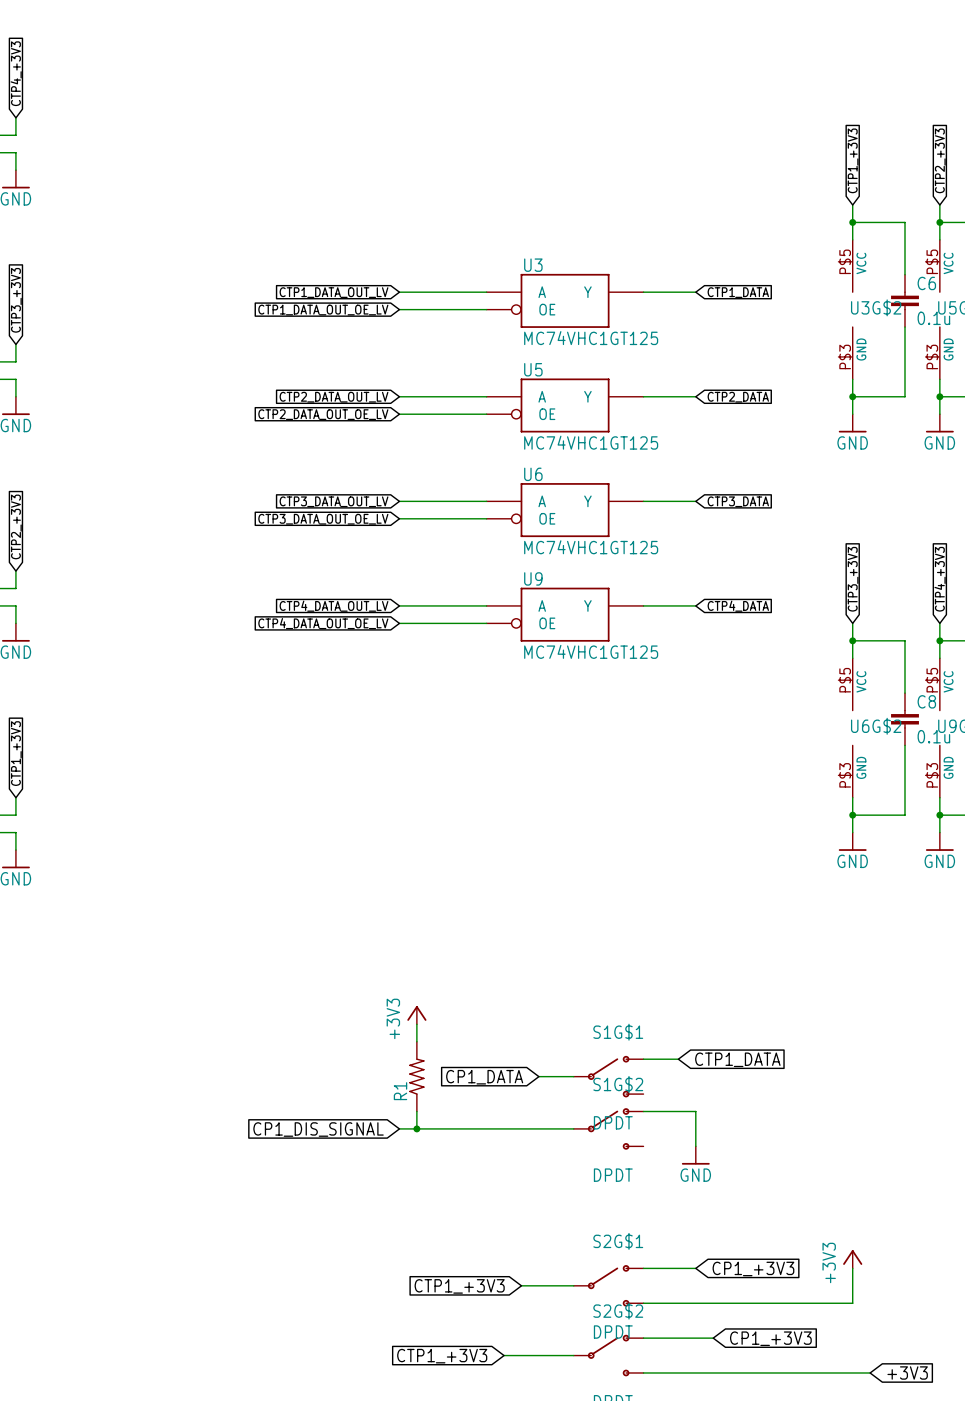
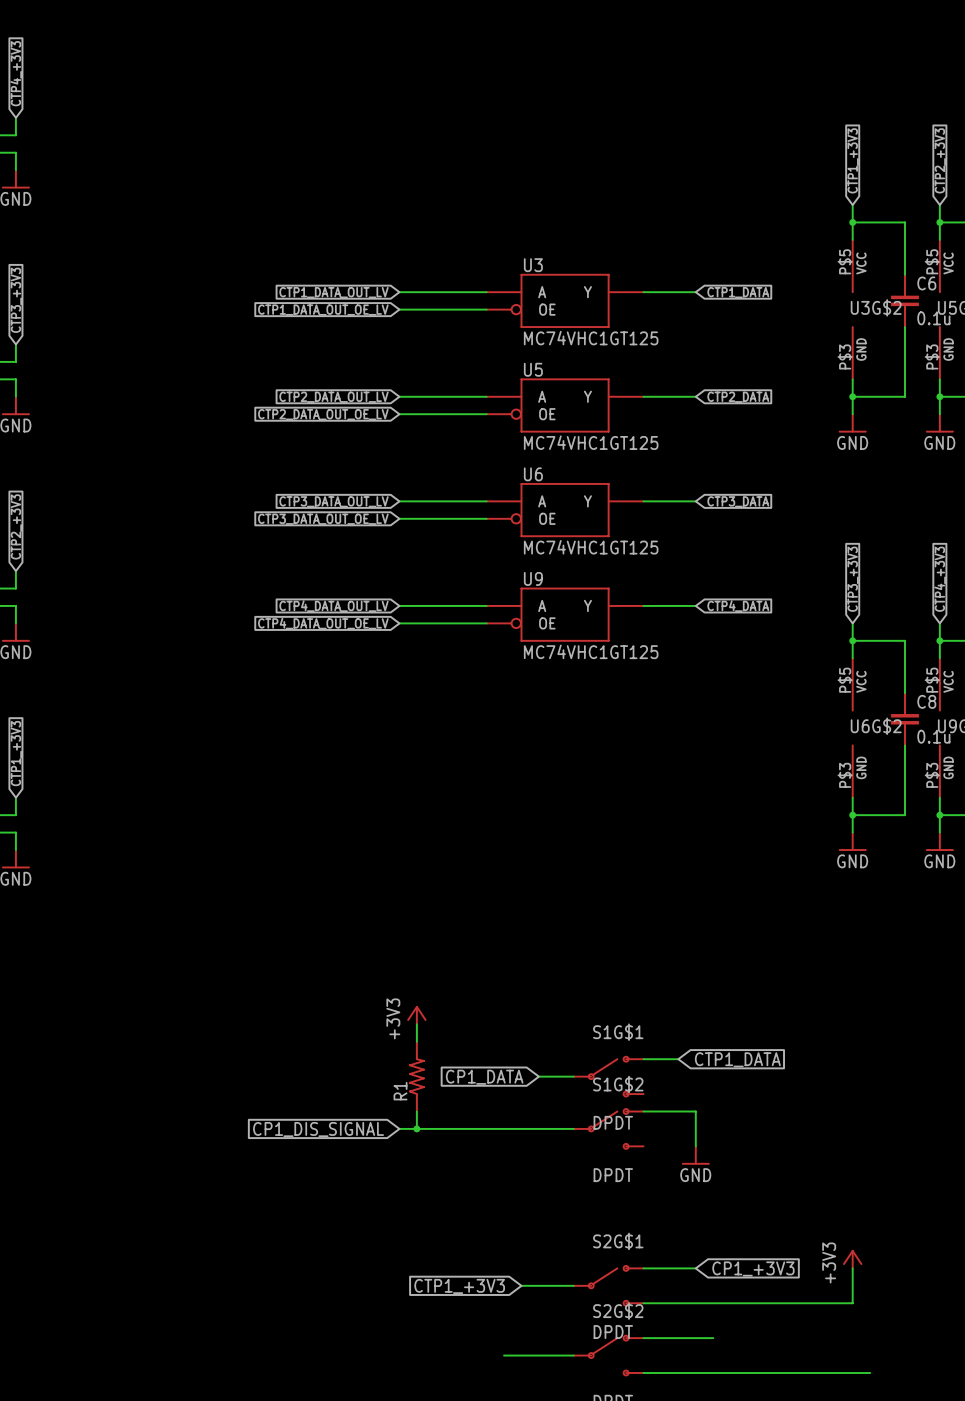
global label: CP1_+3V3 (770, 1338) -> none
global label: CTP1_+3V3 (442, 1356) -> none
global label: +3V3 (907, 1372) -> none

